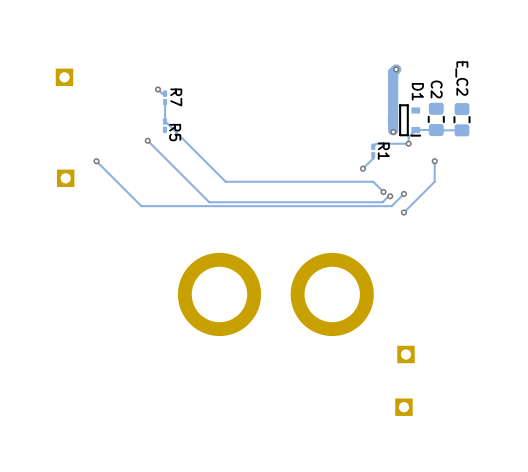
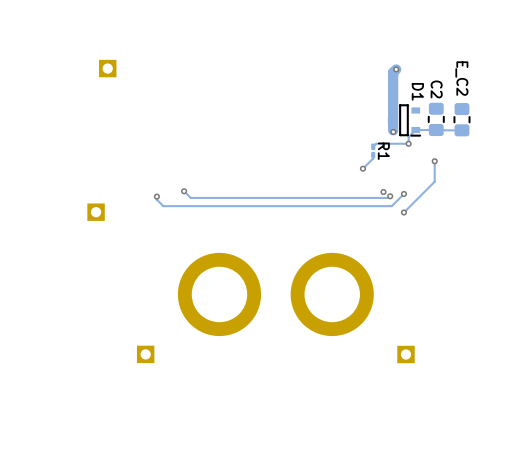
part position: (64, 77) -> (107, 68)
track: (158, 89) (165, 93) -> none
via: (158, 89) -> none
R7: (165, 97) -> none
track: (165, 102) (165, 121) -> none
track: (164, 121) (225, 181) (373, 181) (383, 191) -> none
R5: (164, 125) -> none
track: (147, 140) (209, 202) (382, 202) (390, 196) -> none
via: (147, 140) -> none
track: (96, 161) (141, 206) (163, 206) -> (156, 196) (156, 199) (163, 206)
via: (96, 161) -> none
part position: (65, 178) -> (96, 212)
track: none -> (184, 191) (190, 197) (389, 197) (391, 196)
via: none -> (184, 191)
via: none -> (156, 196)
part: none -> (145, 354)
part: (403, 407) -> none

